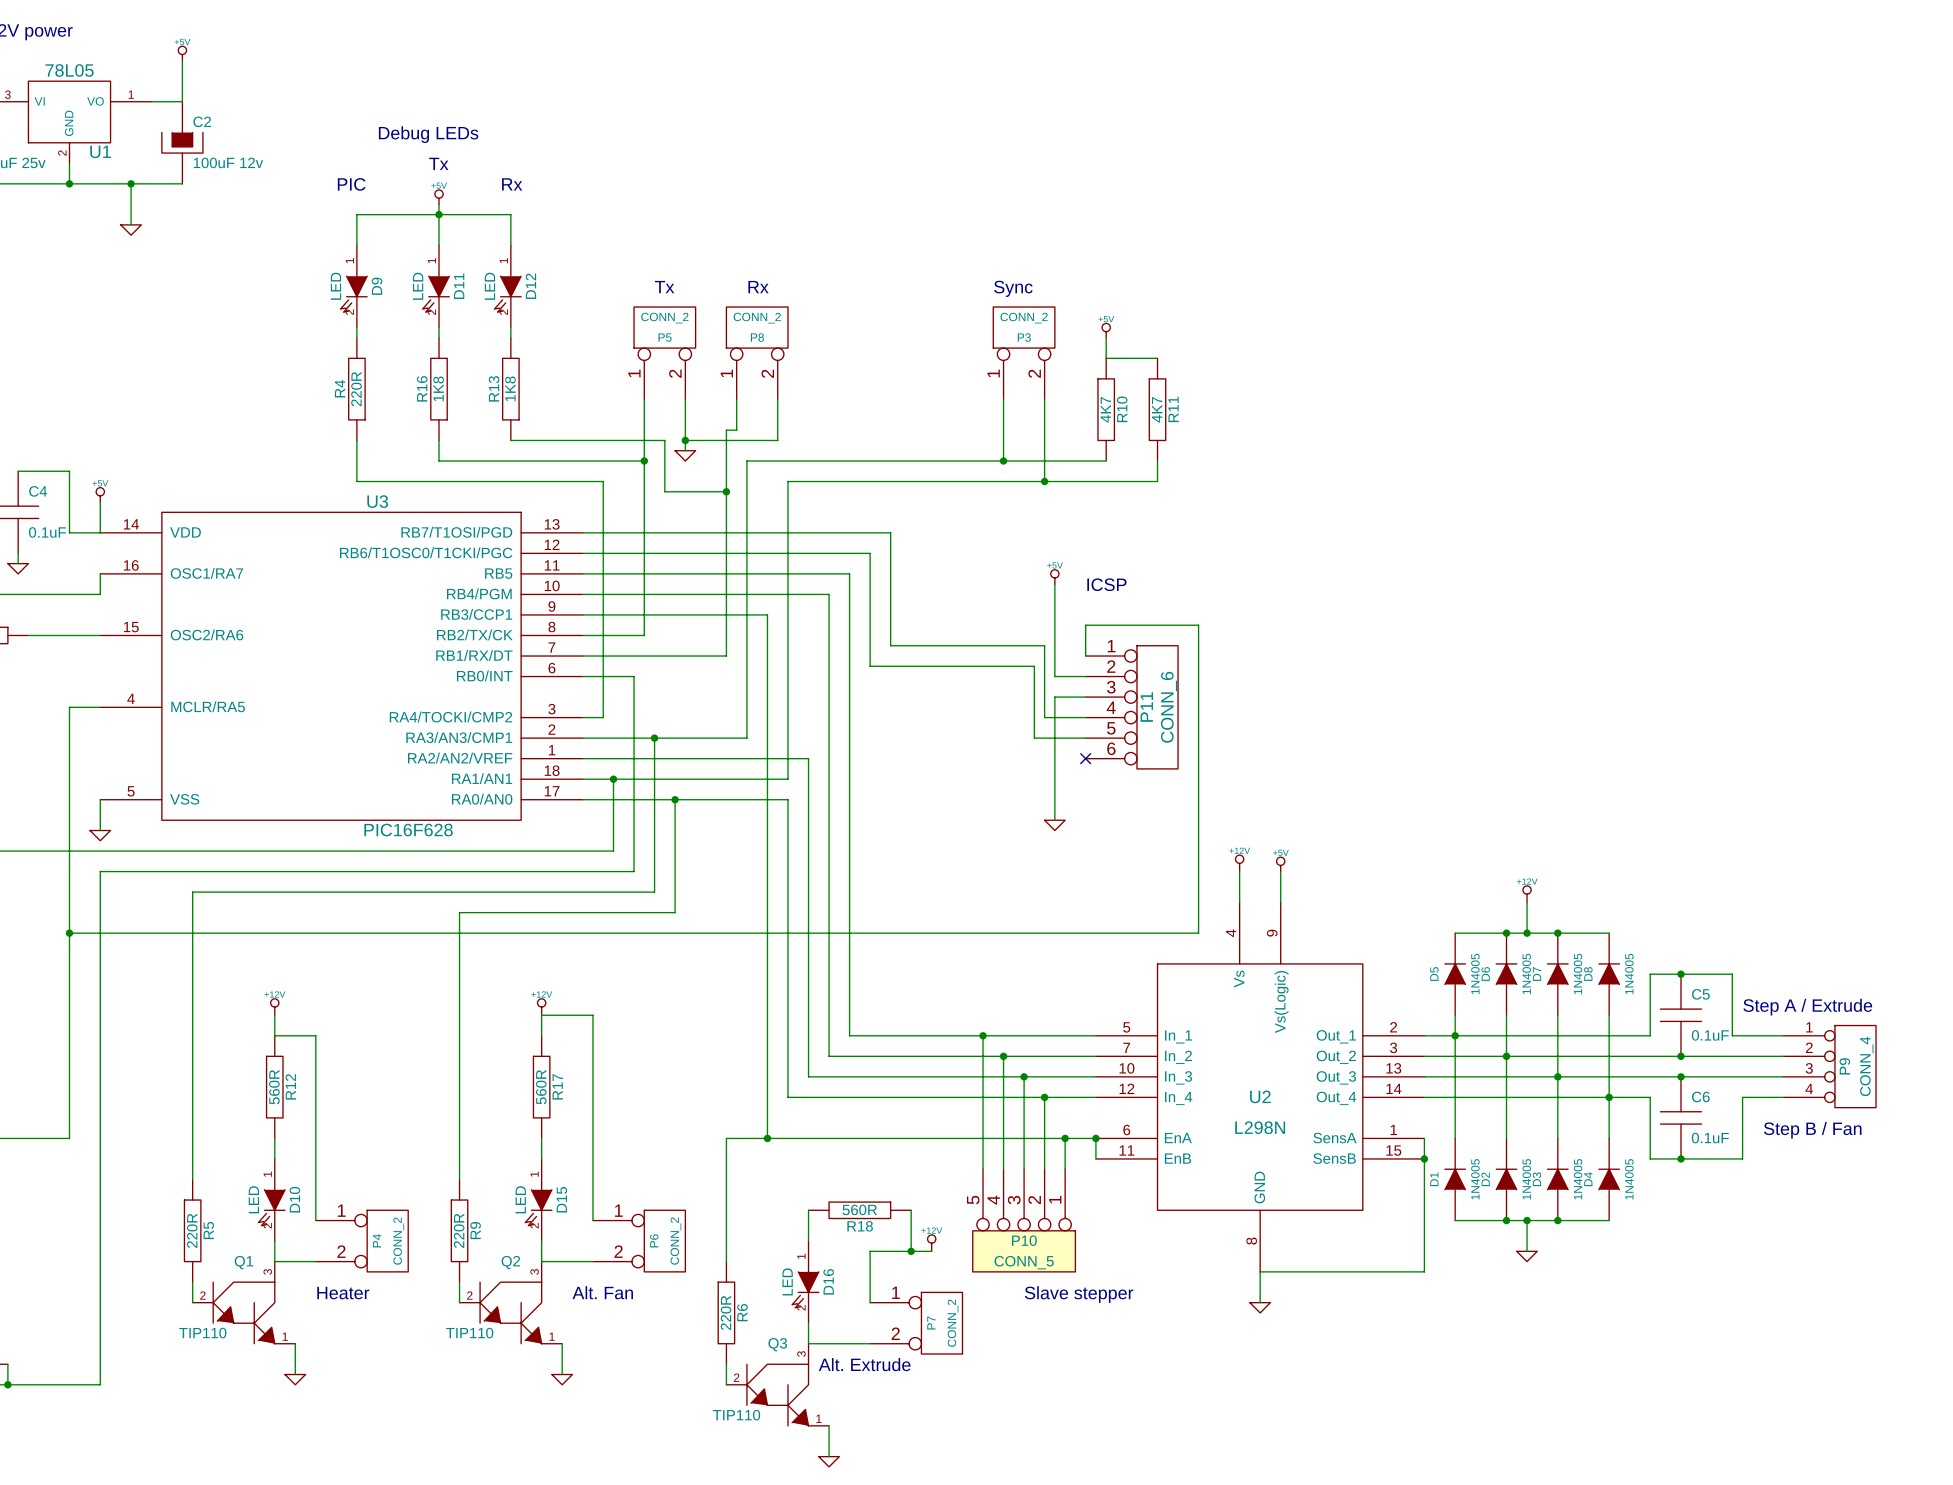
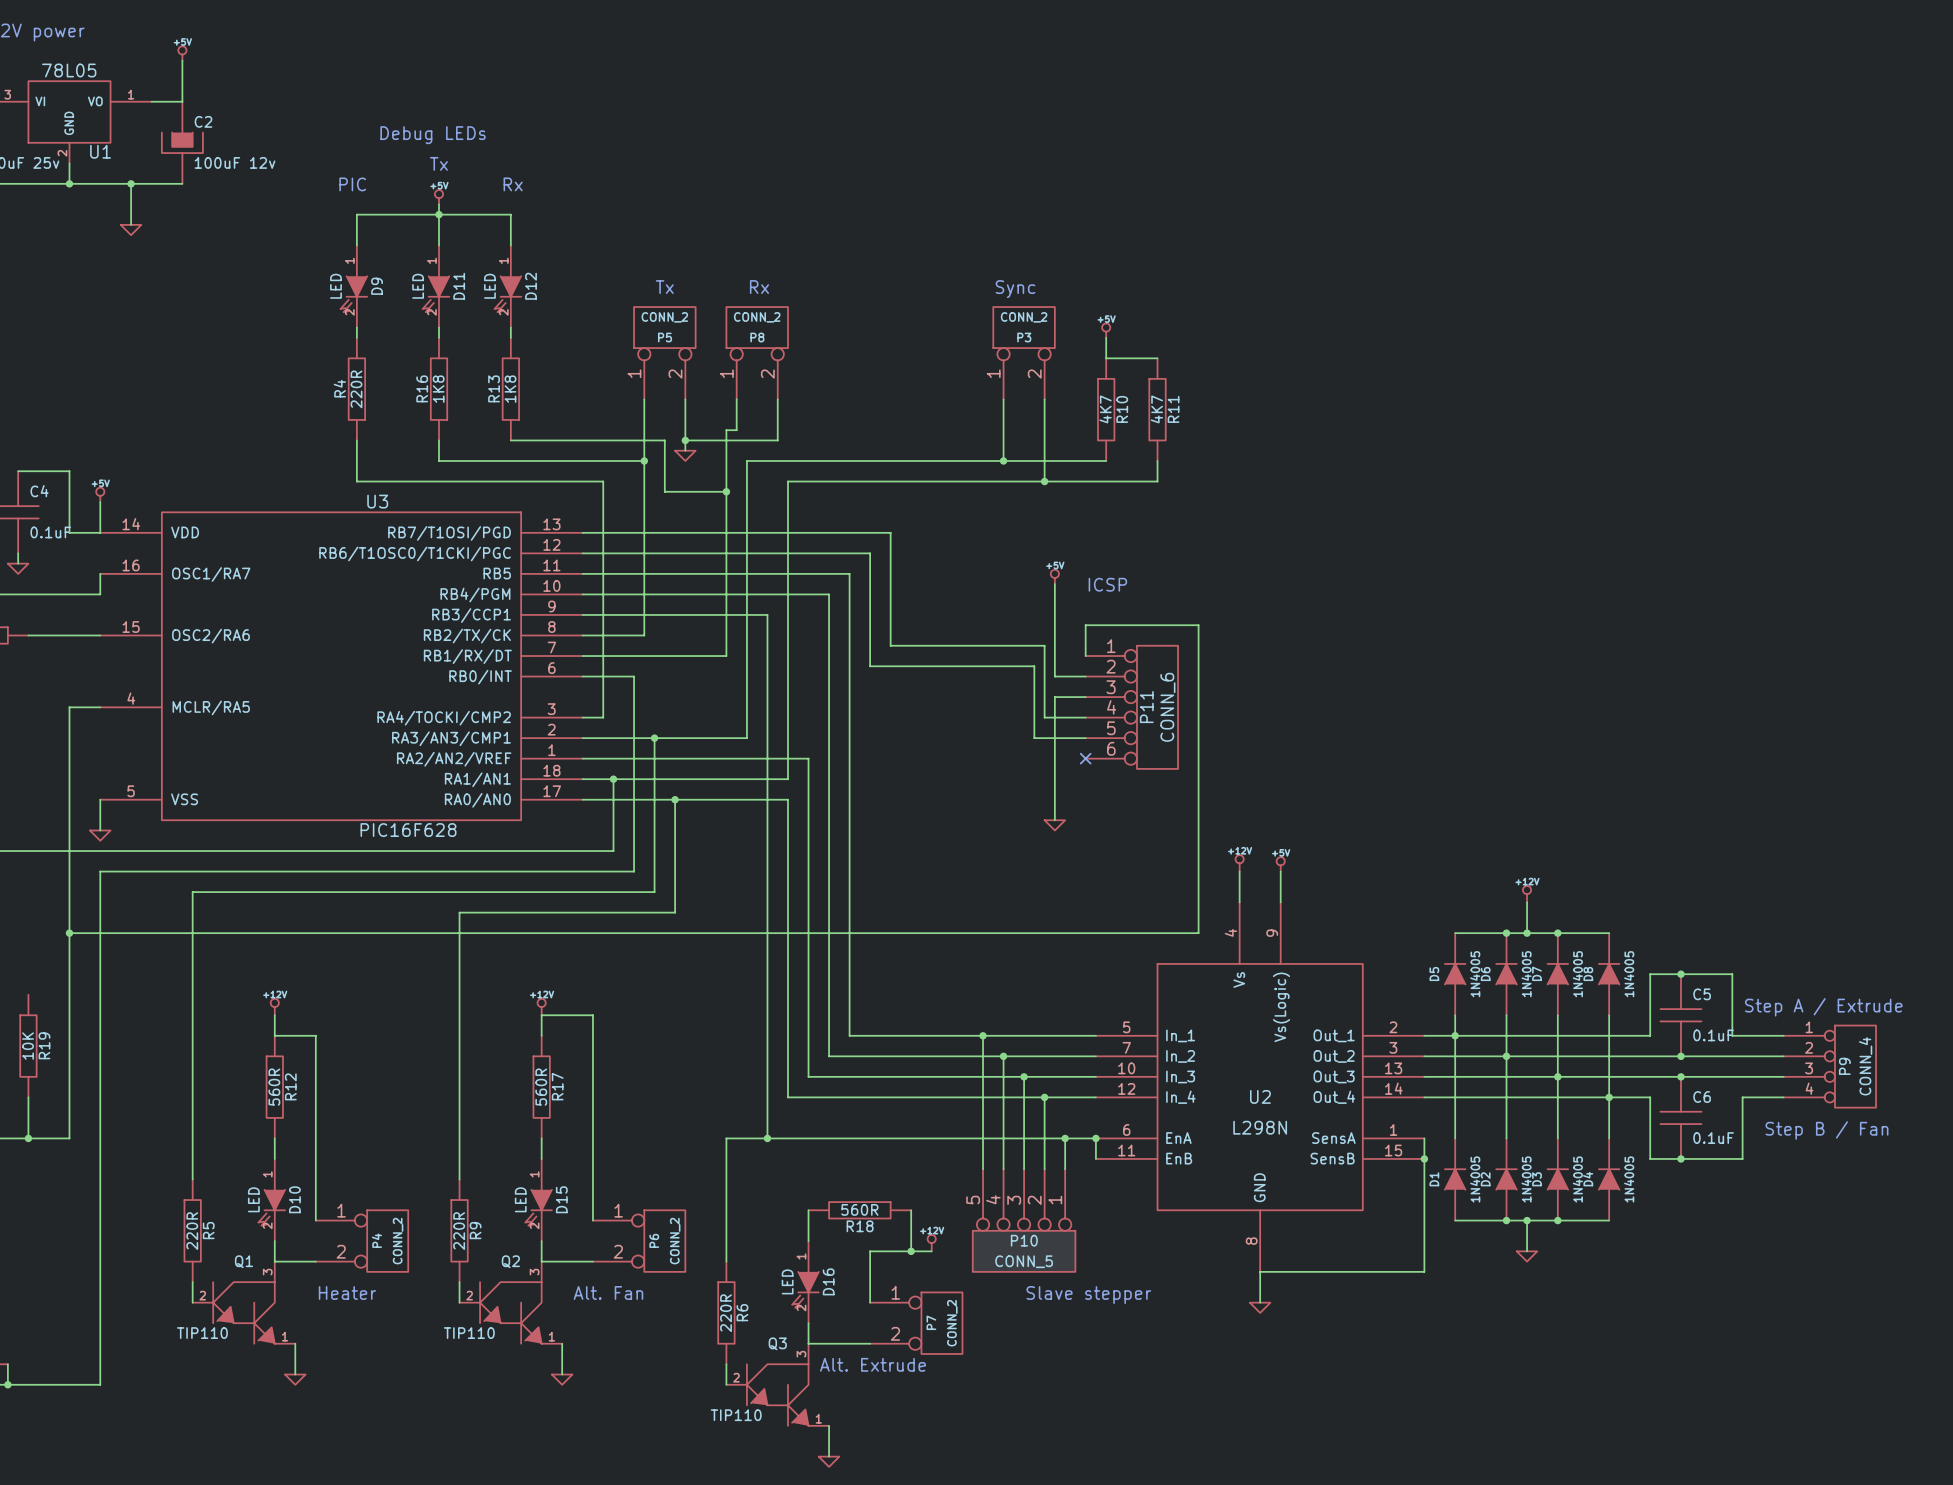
R19: none -> 10K (28, 1046)
wire: none -> (28, 1097) (28, 1138)
junction: none -> (28, 1138)

